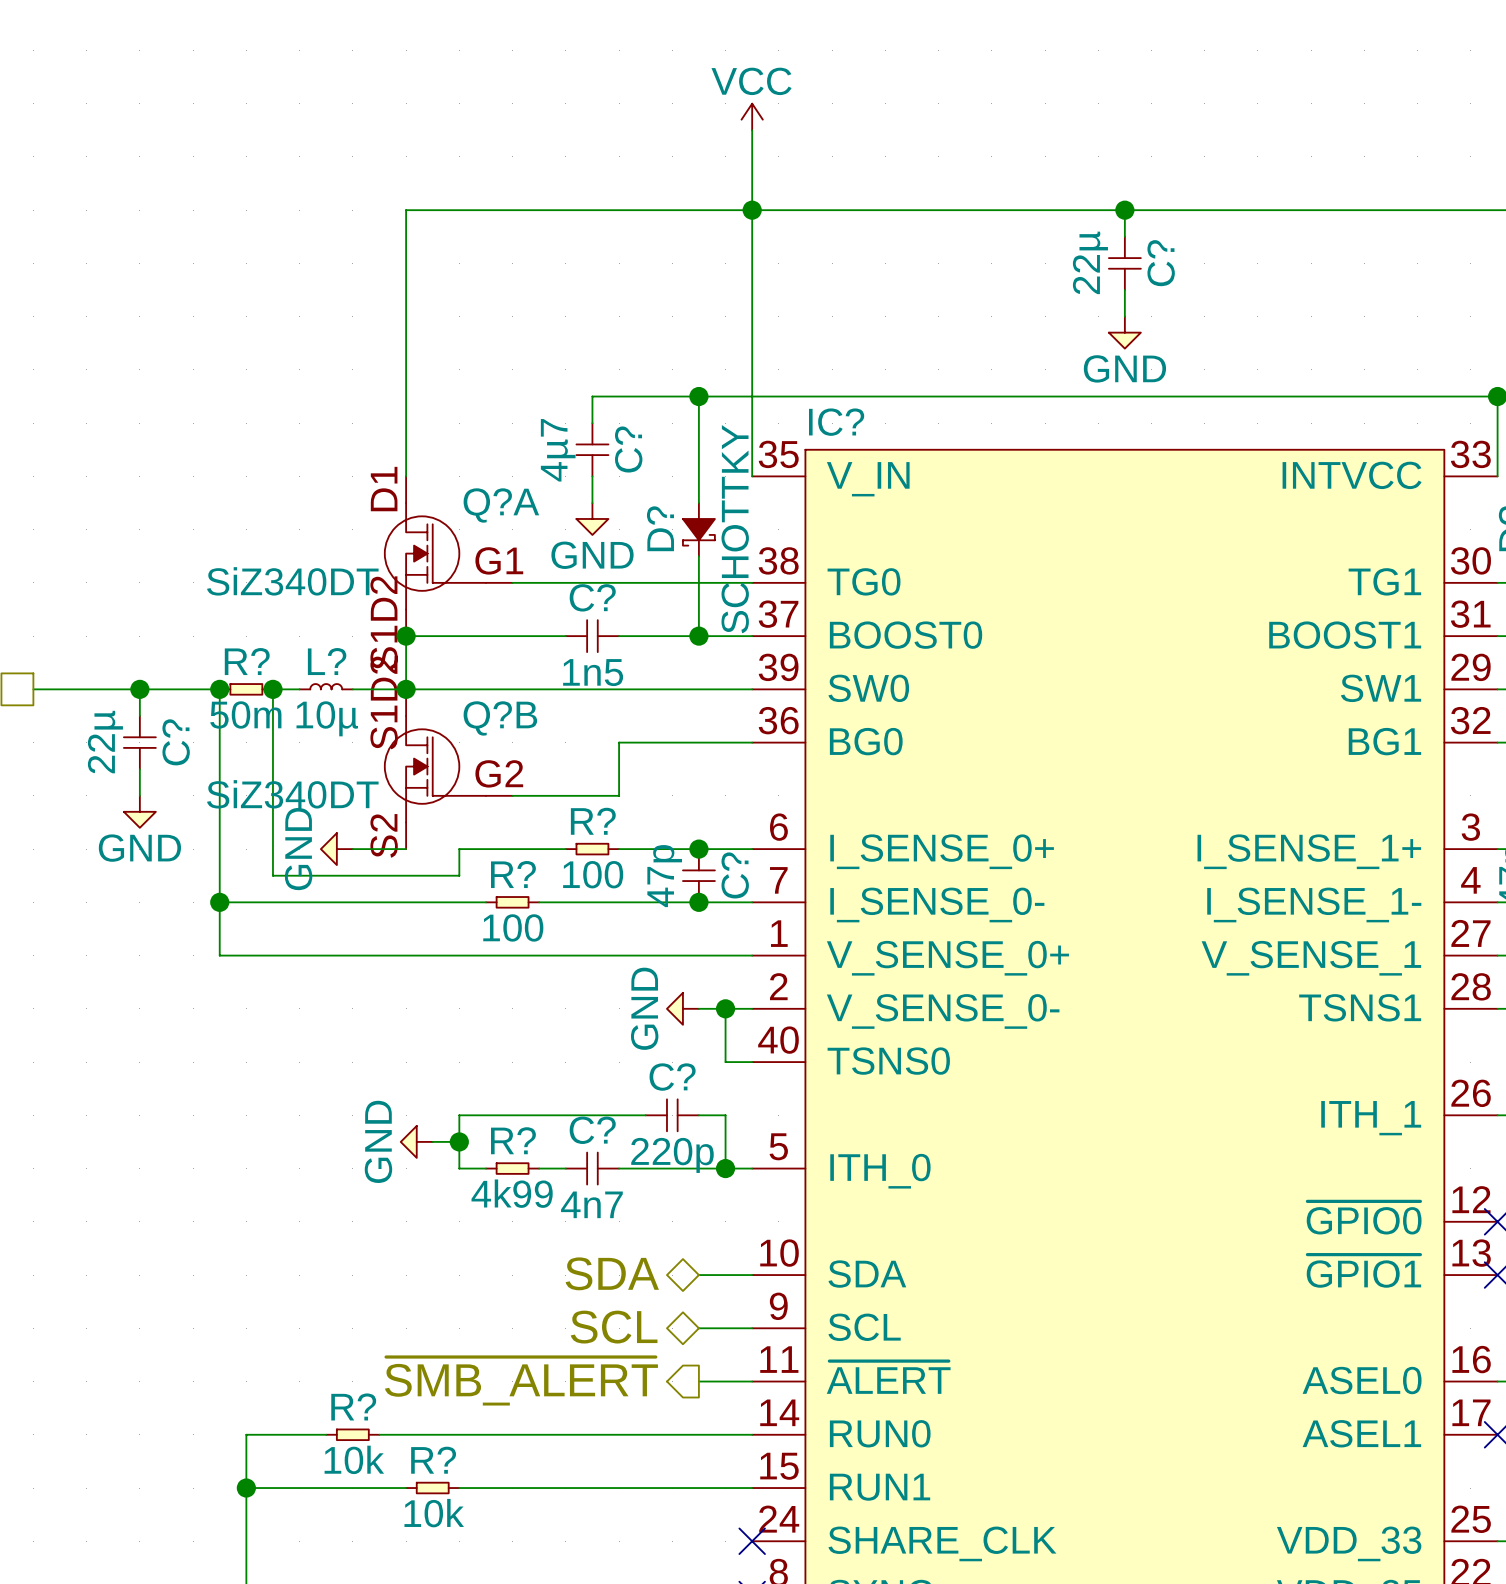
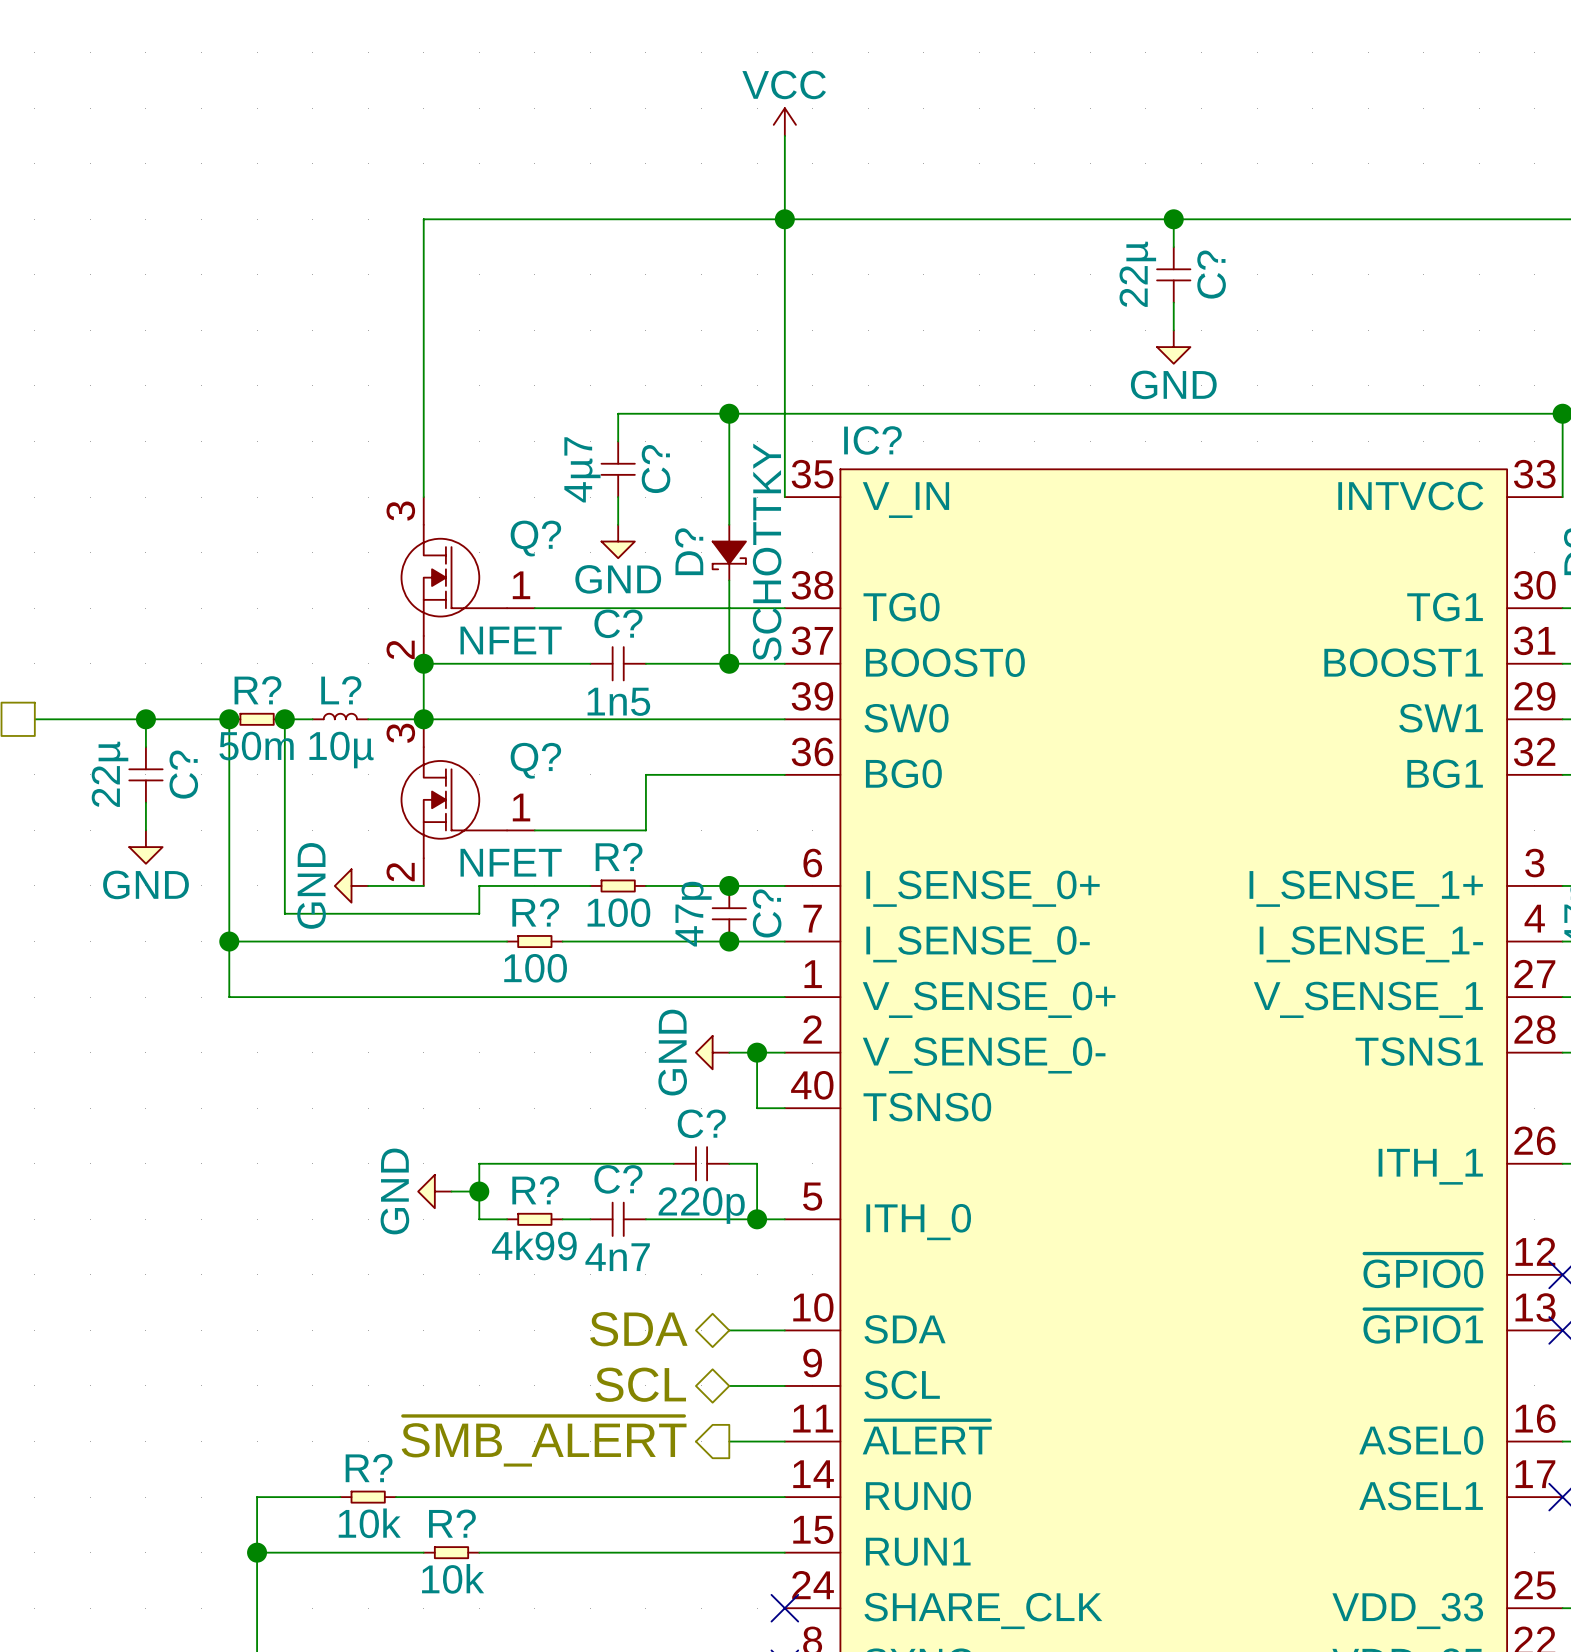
Q?A pin number: D1 (384, 489) -> 3 (400, 511)
Q?A name: Q?A (501, 505) -> Q? (535, 538)
Q?A pin number: G1 (499, 560) -> 1 (521, 585)
Q?A value: SiZ340DT (292, 581) -> NFET (511, 640)
Q?A pin number: S1D2 (384, 622) -> 2 (400, 649)
Q?B pin number: S1D2 (384, 702) -> 3 (400, 733)
Q?B name: Q?B (500, 718) -> Q? (535, 760)
Q?B pin number: G2 (499, 773) -> 1 (521, 807)
Q?B value: SiZ340DT (292, 794) -> NFET (511, 862)
Q?B pin number: S2 (384, 835) -> 2 (400, 872)

